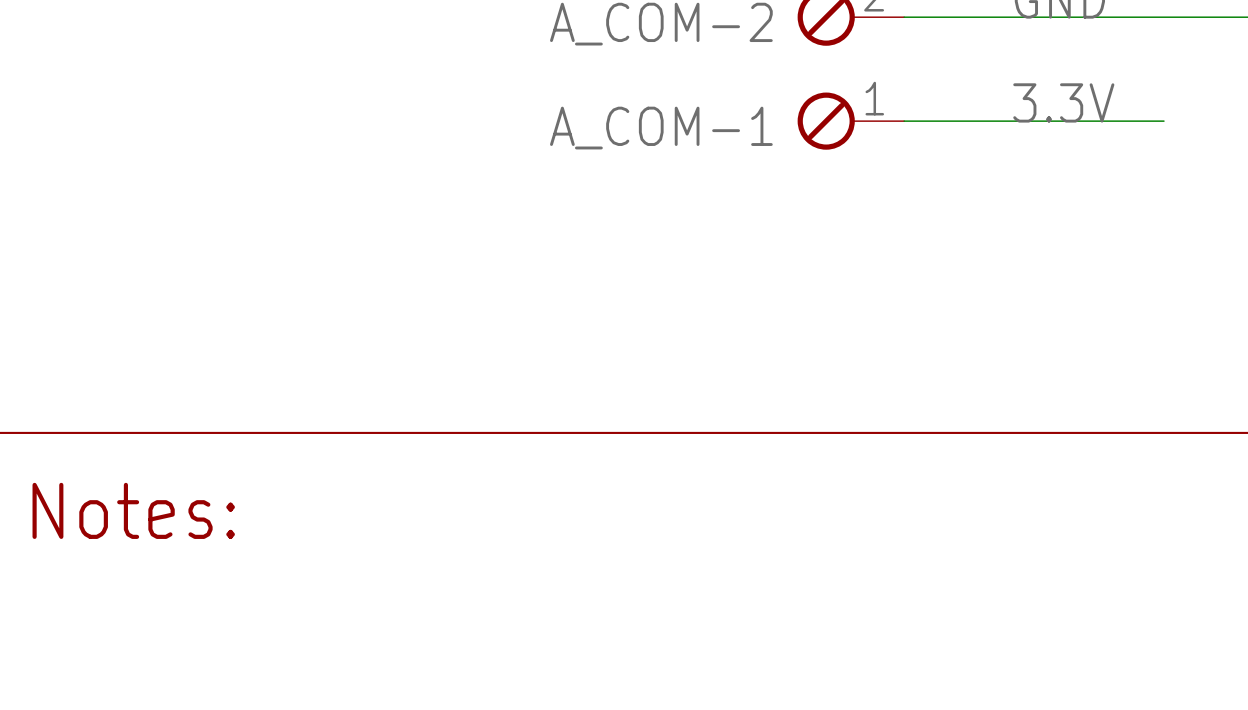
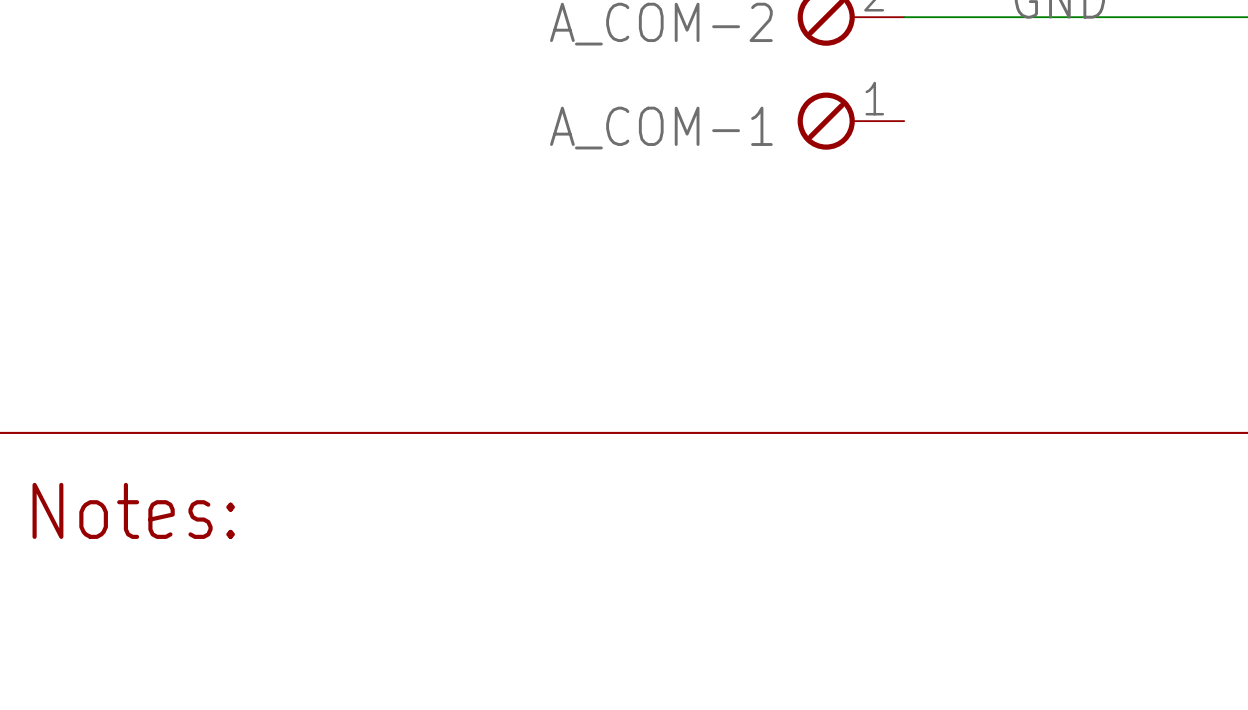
label: 3.3V (1063, 102) -> none
wire: (904, 121) (1164, 121) -> none

